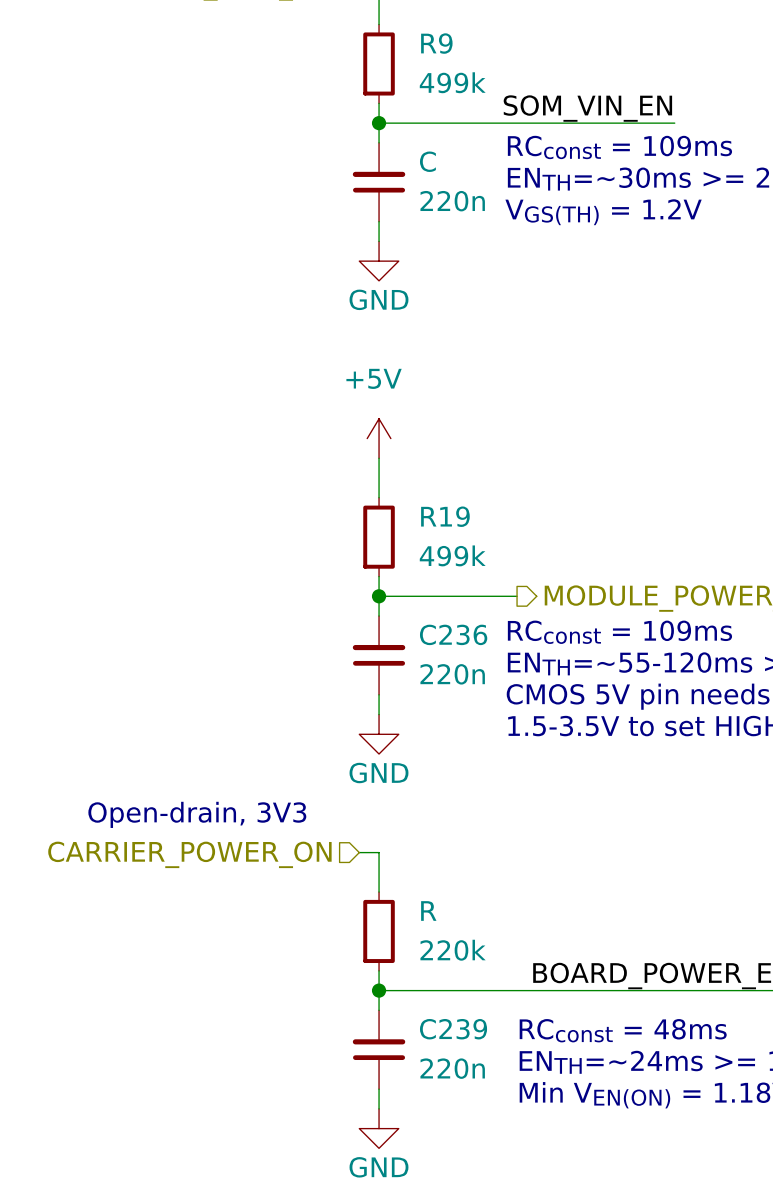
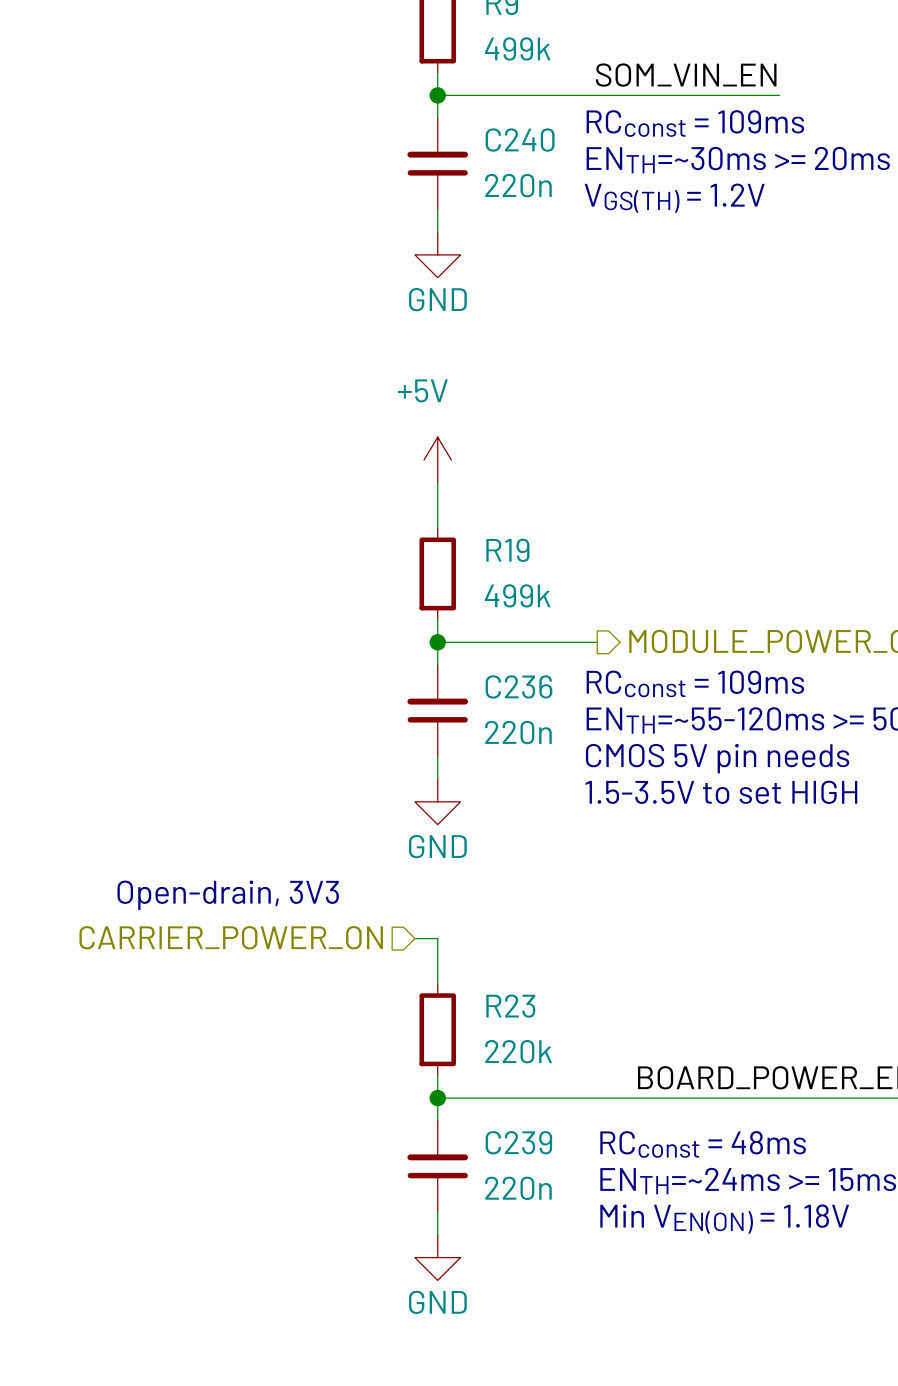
C name: C (427, 161) -> C240 (520, 140)
R name: R (428, 911) -> R23 (510, 1006)

